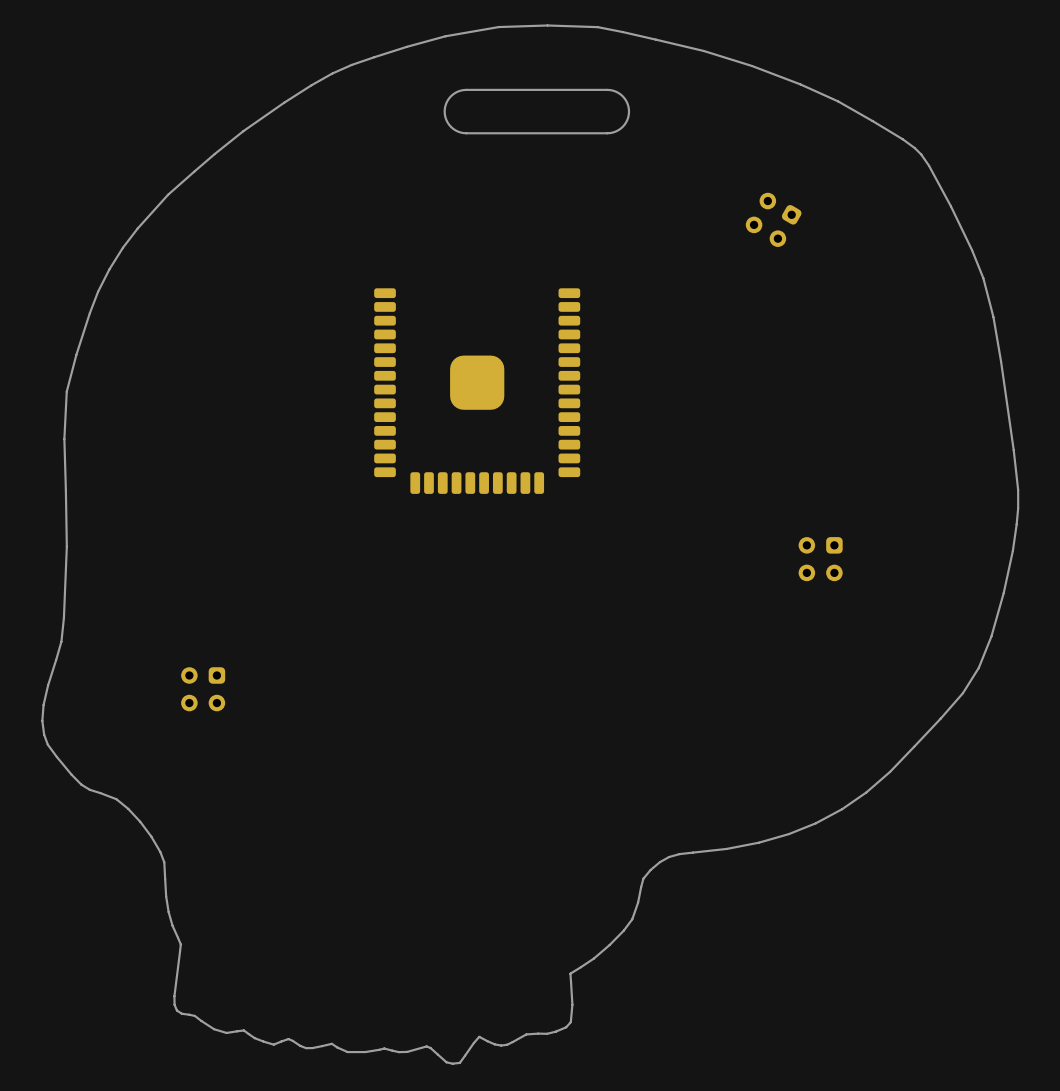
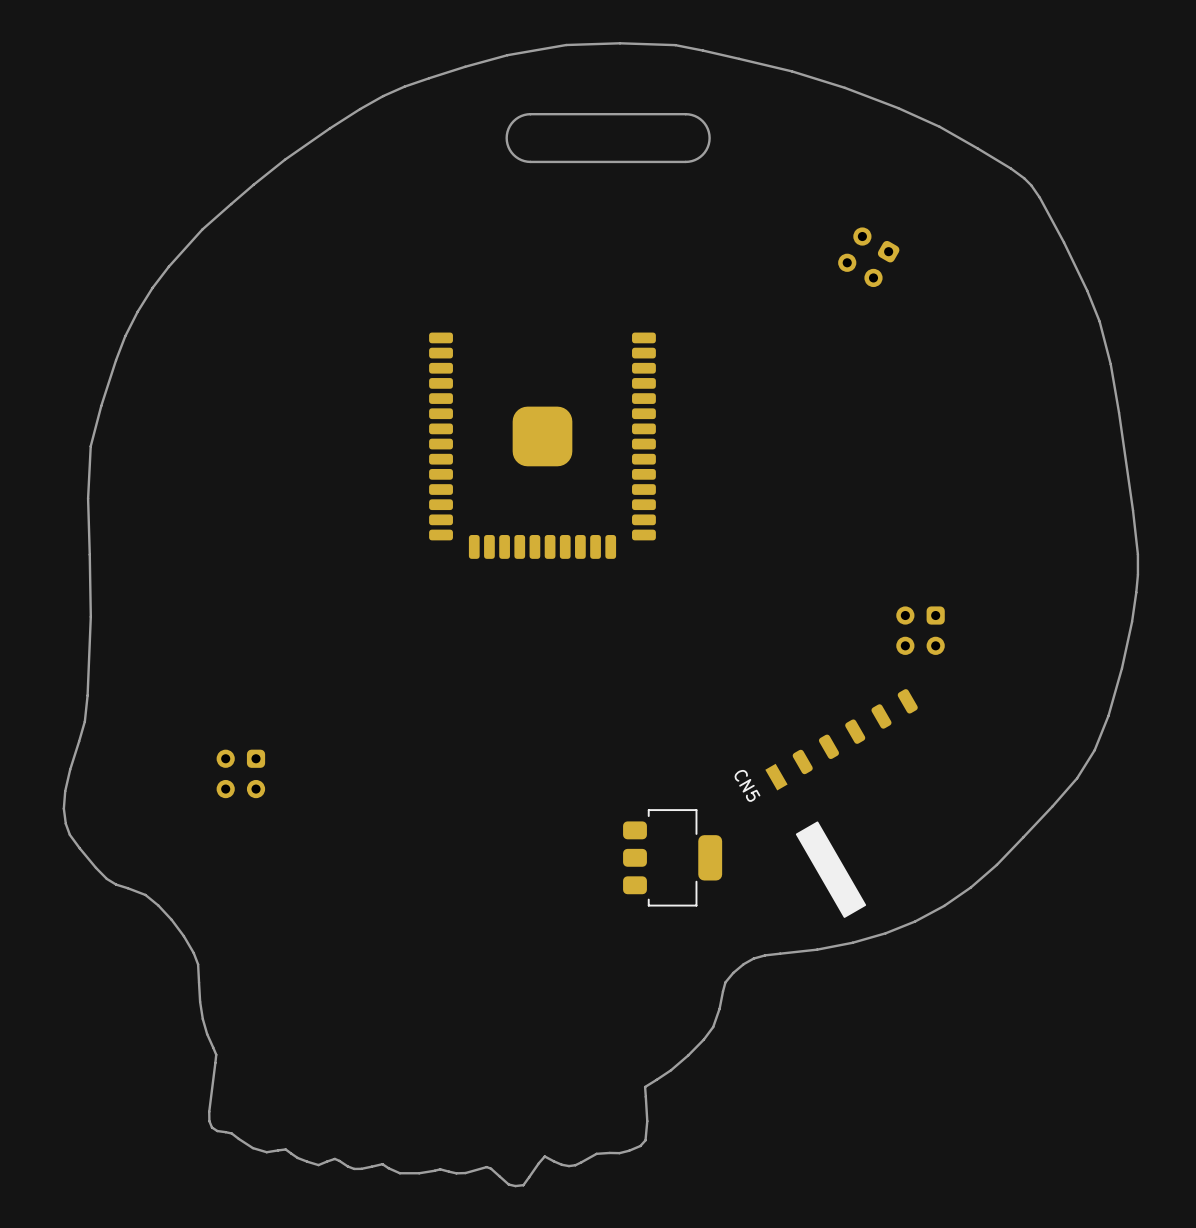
CN5: none -> (841, 803)
part: none -> (672, 857)

